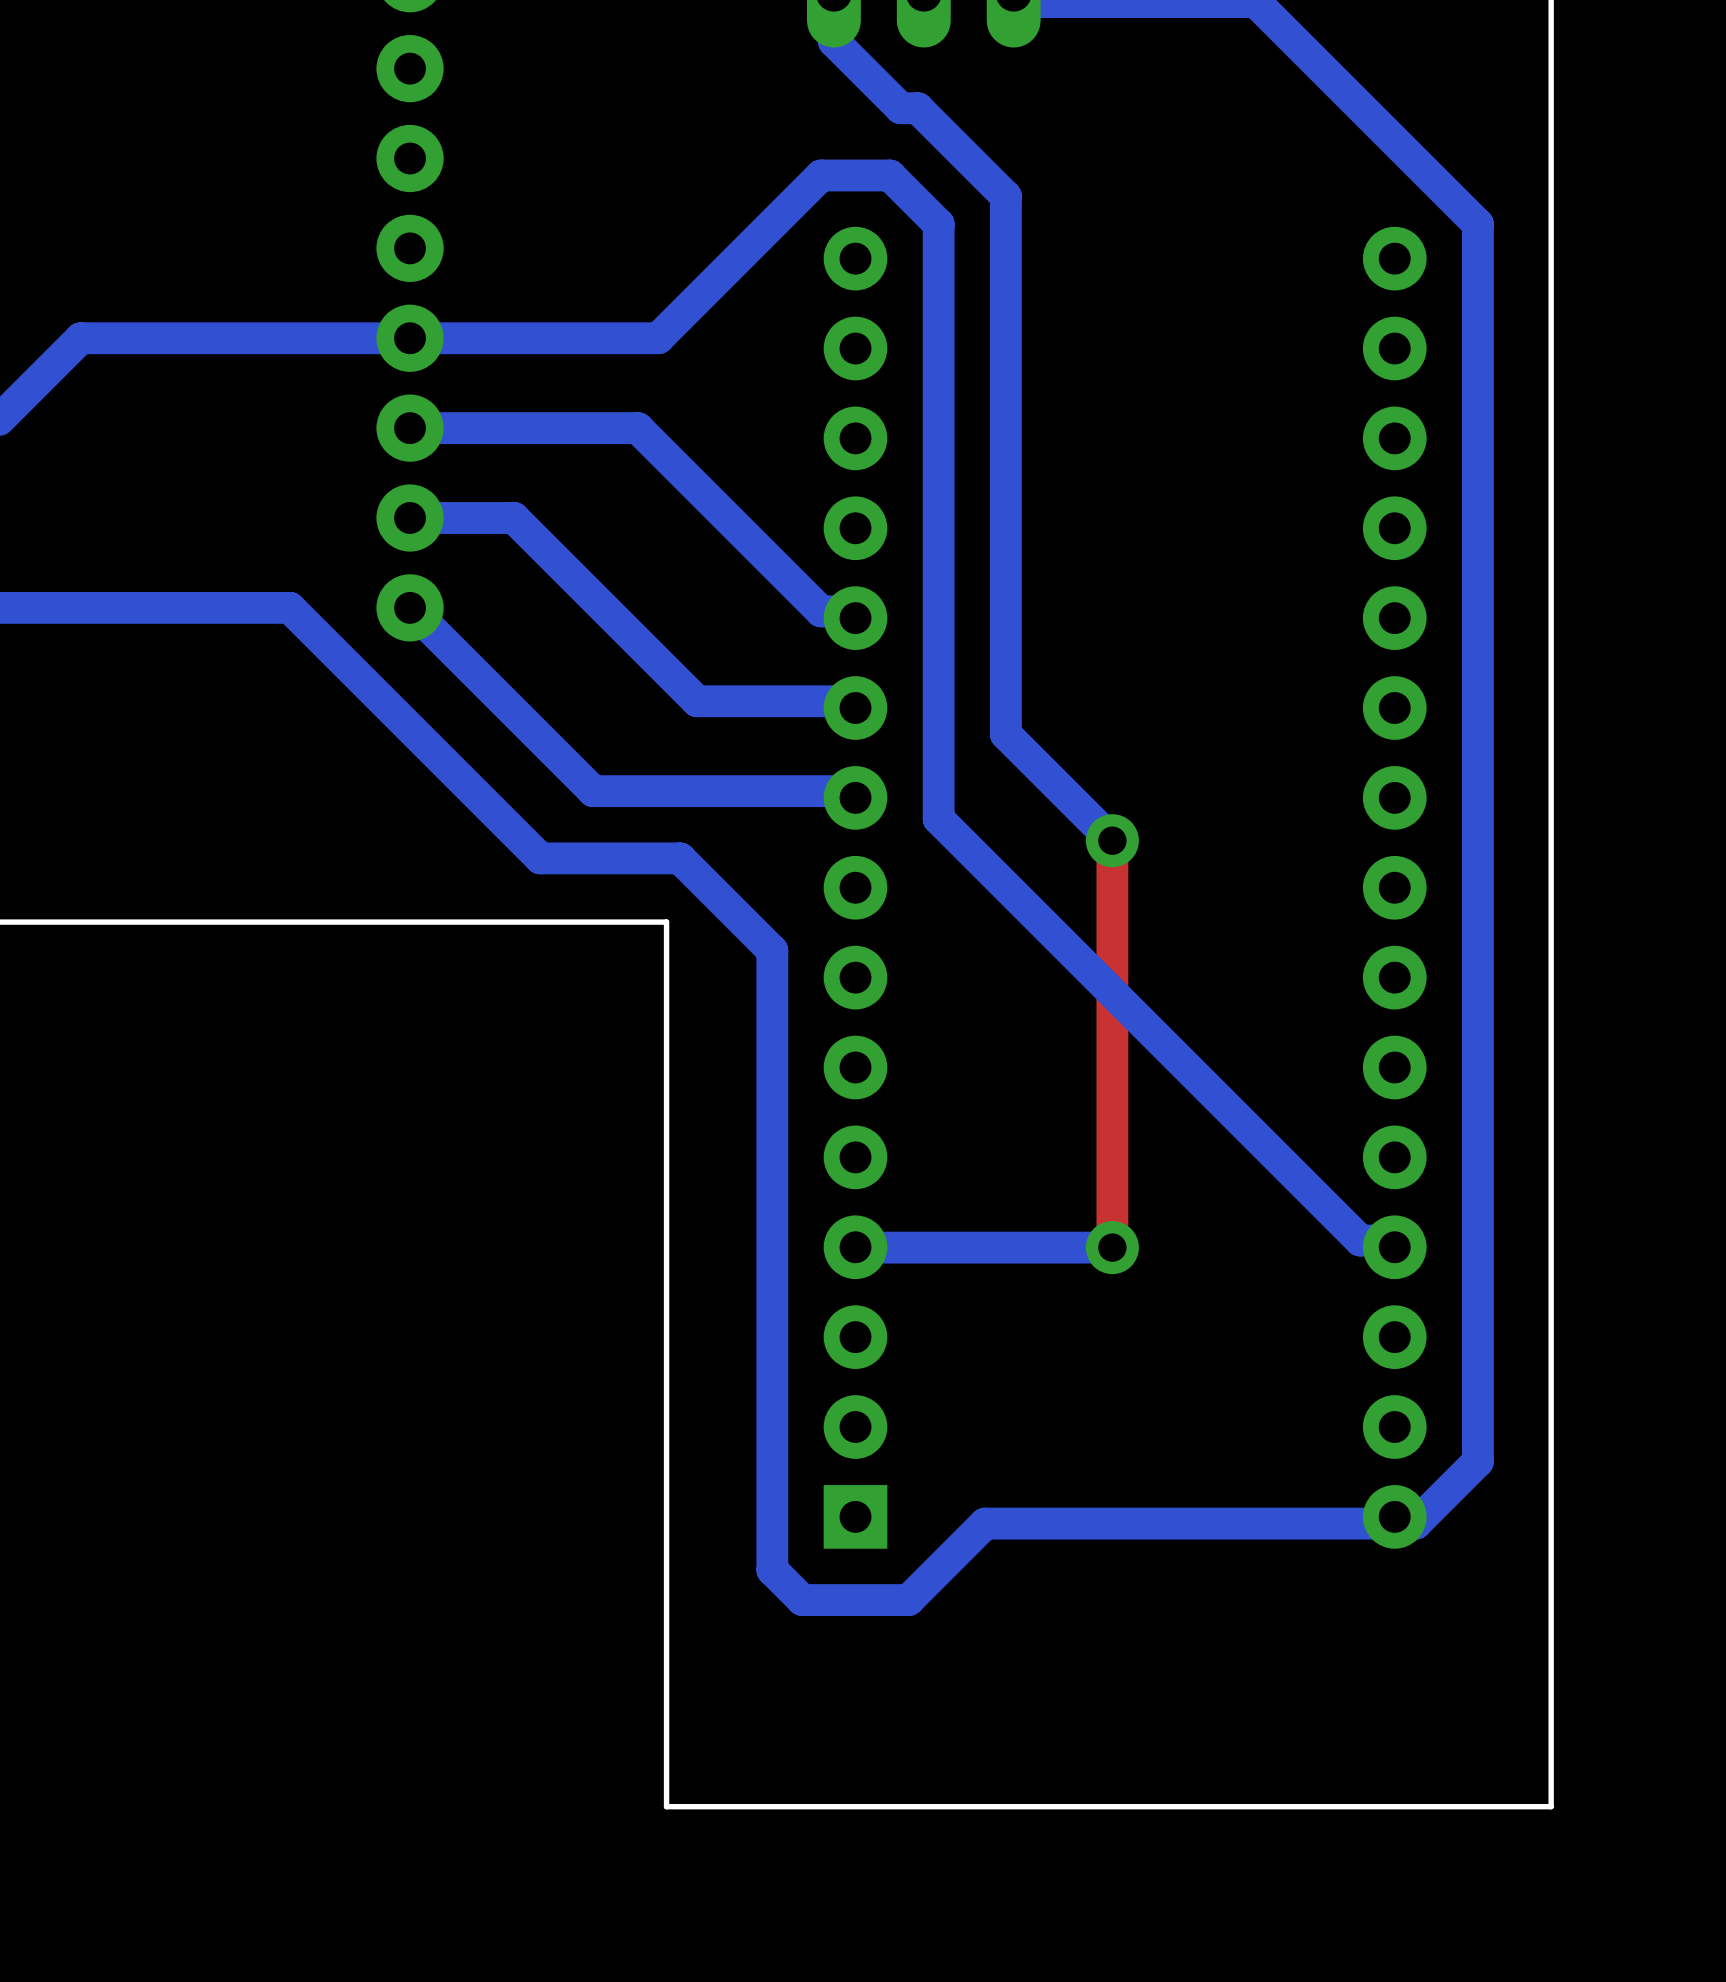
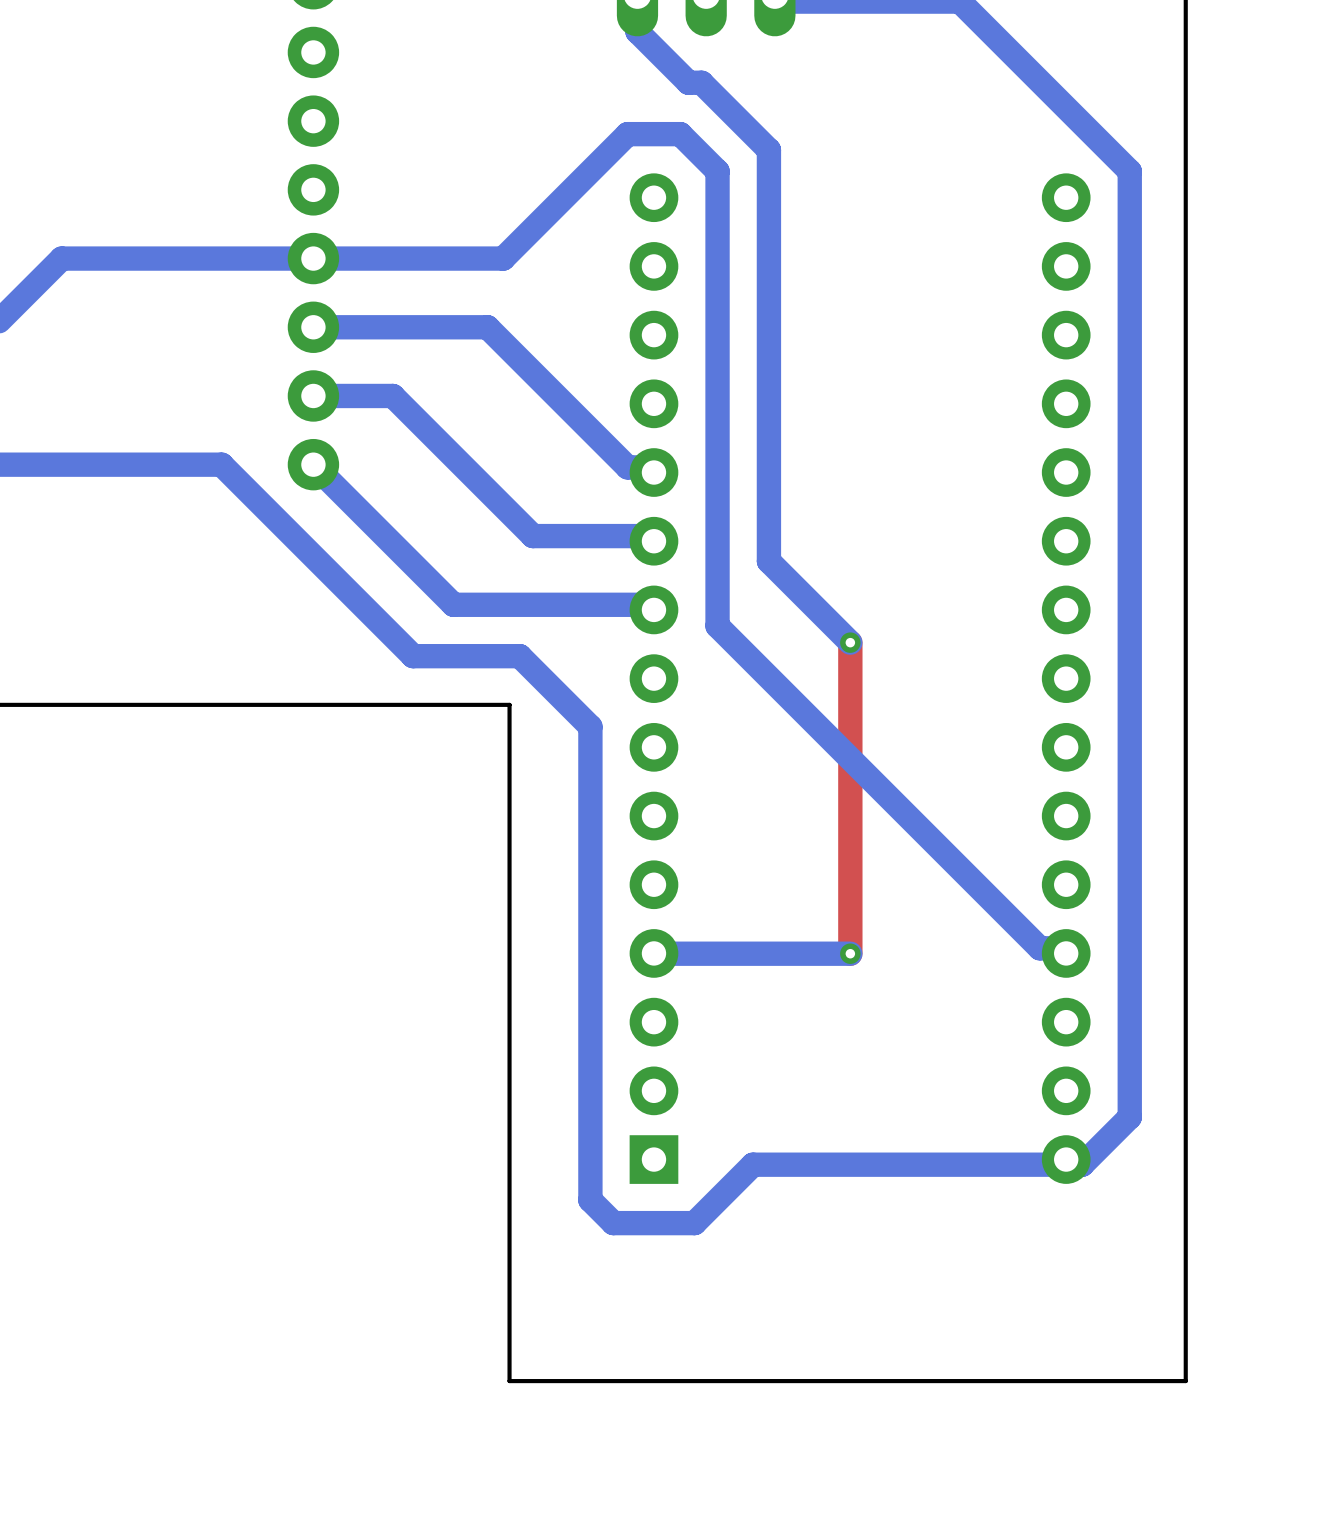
via size: [1085, 814, 1139, 868] -> [840, 632, 861, 653]
via size: [1085, 1221, 1139, 1275] -> [840, 943, 861, 964]

